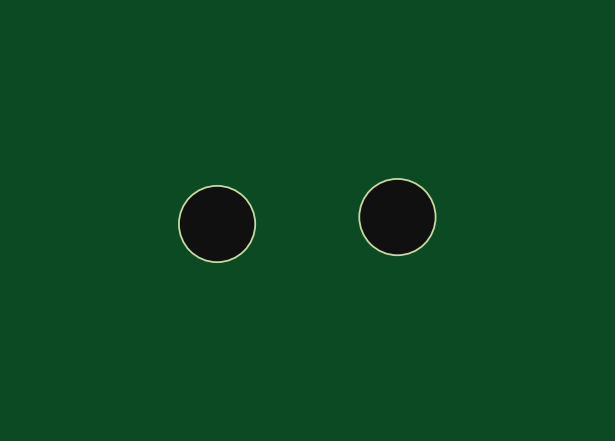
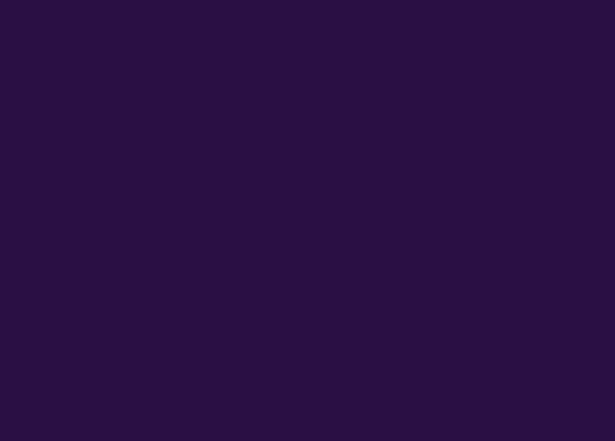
part: (397, 217) -> none
part: (217, 224) -> none

